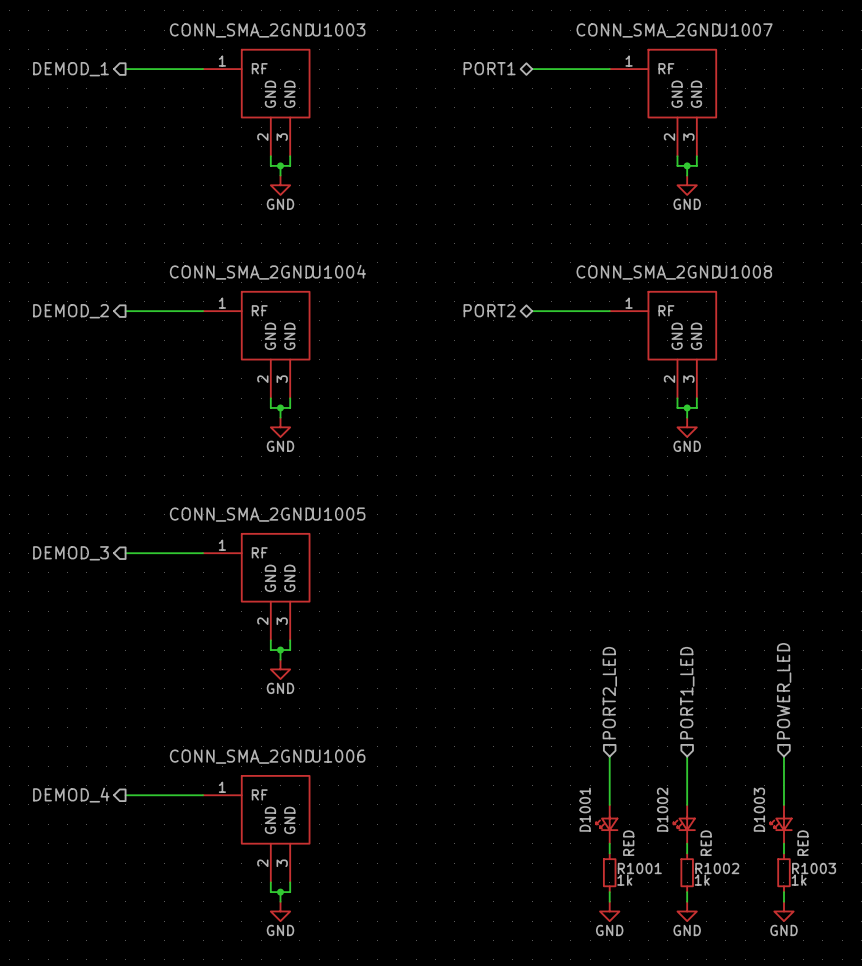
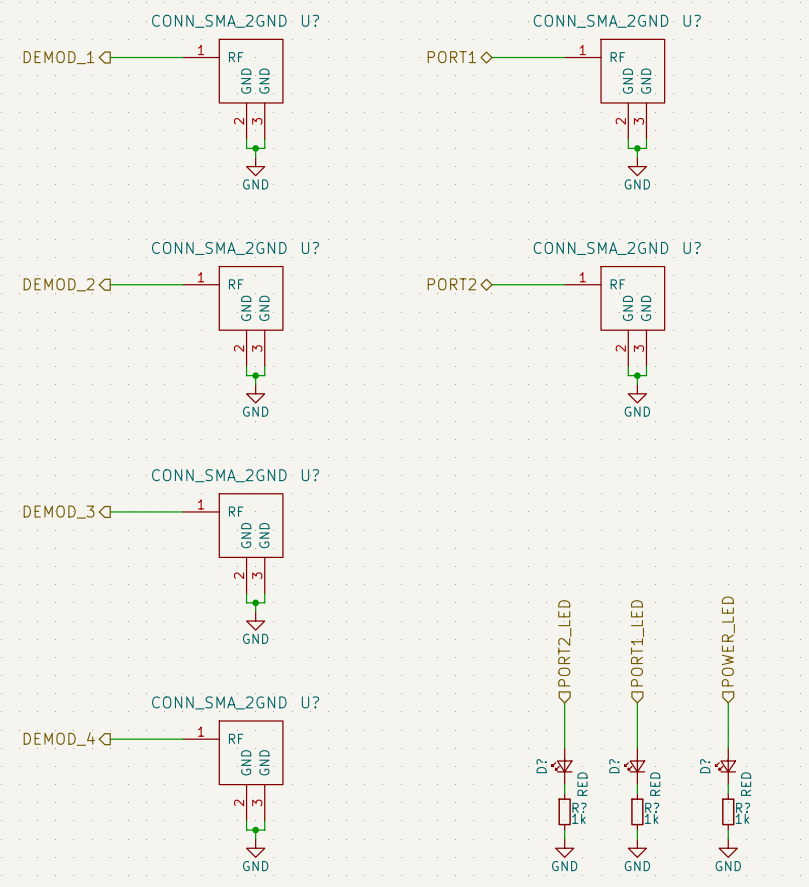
U1003 name: U1003 (338, 29) -> U? (310, 20)
U1007 name: U1007 (745, 29) -> U? (692, 20)
U1004 name: U1004 (339, 271) -> U? (310, 247)
U1008 name: U1008 (745, 271) -> U? (692, 247)
U1005 name: U1005 (338, 514) -> U? (310, 475)
U1006 name: U1006 (338, 756) -> U? (310, 702)
D1001 name: D1001 (585, 809) -> D? (541, 766)
D1002 name: D1002 (662, 809) -> D? (614, 766)
D1003 name: D1003 (759, 809) -> D? (705, 766)
R1001 name: R1001 (639, 868) -> R? (579, 807)
R1002 name: R1002 (717, 868) -> R? (652, 807)
R1003 name: R1003 (814, 868) -> R? (743, 807)

